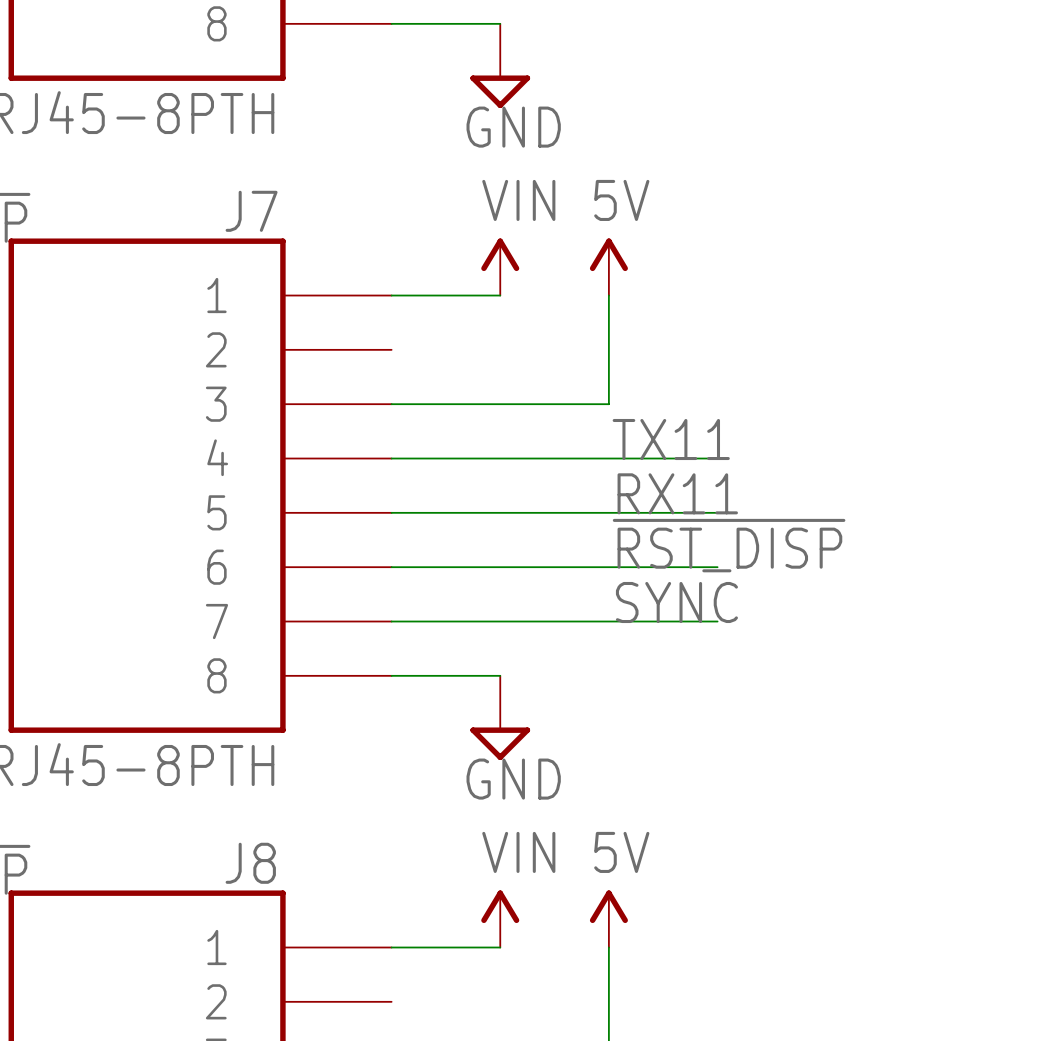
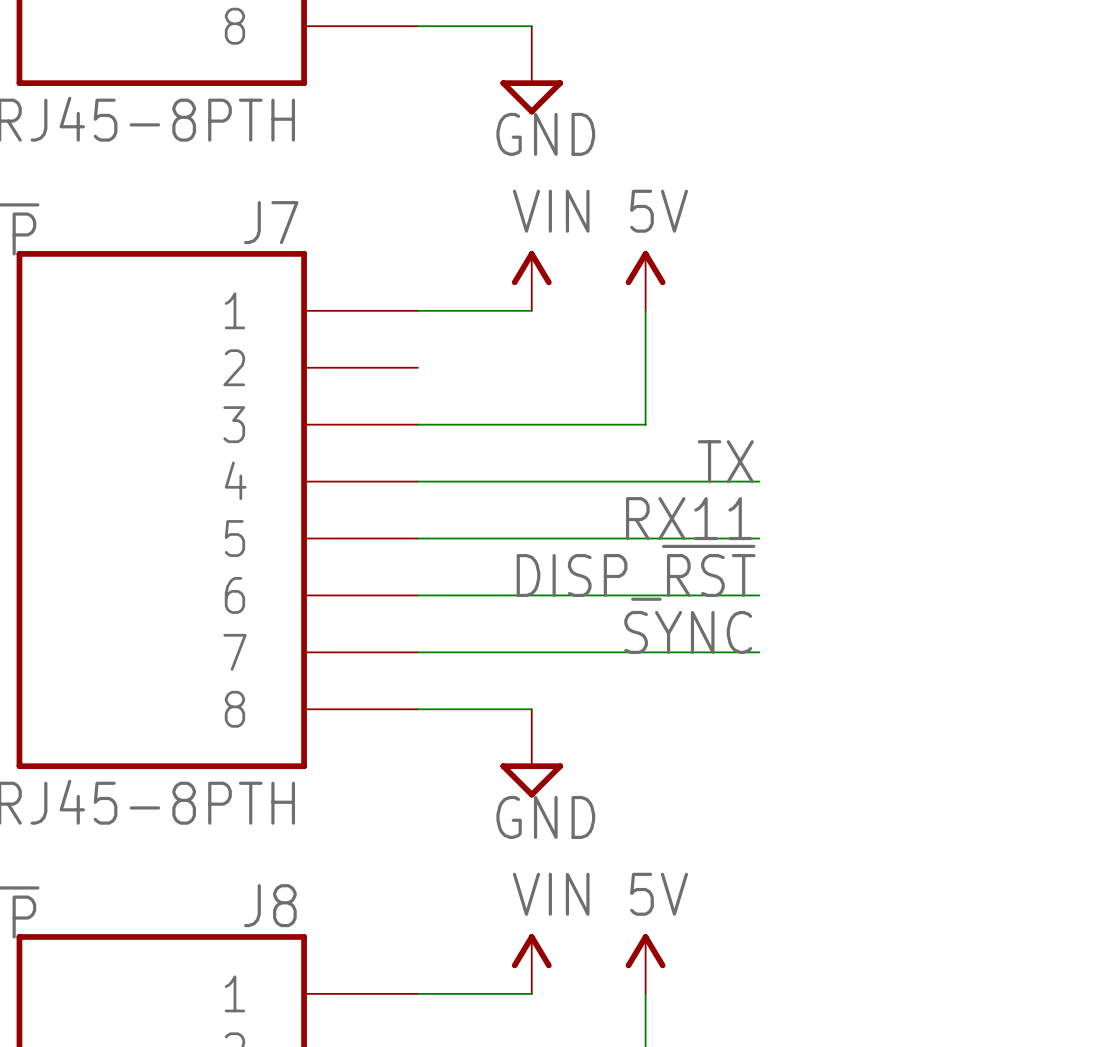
label: TX11 (671, 439) -> TX (725, 461)
label position: RX11 (677, 493) -> RX11 (689, 518)
label: none -> DISP_~{RST} (636, 572)
label: ~{RST_DISP} (729, 545) -> none
label position: SYNC (676, 602) -> SYNC (688, 632)

